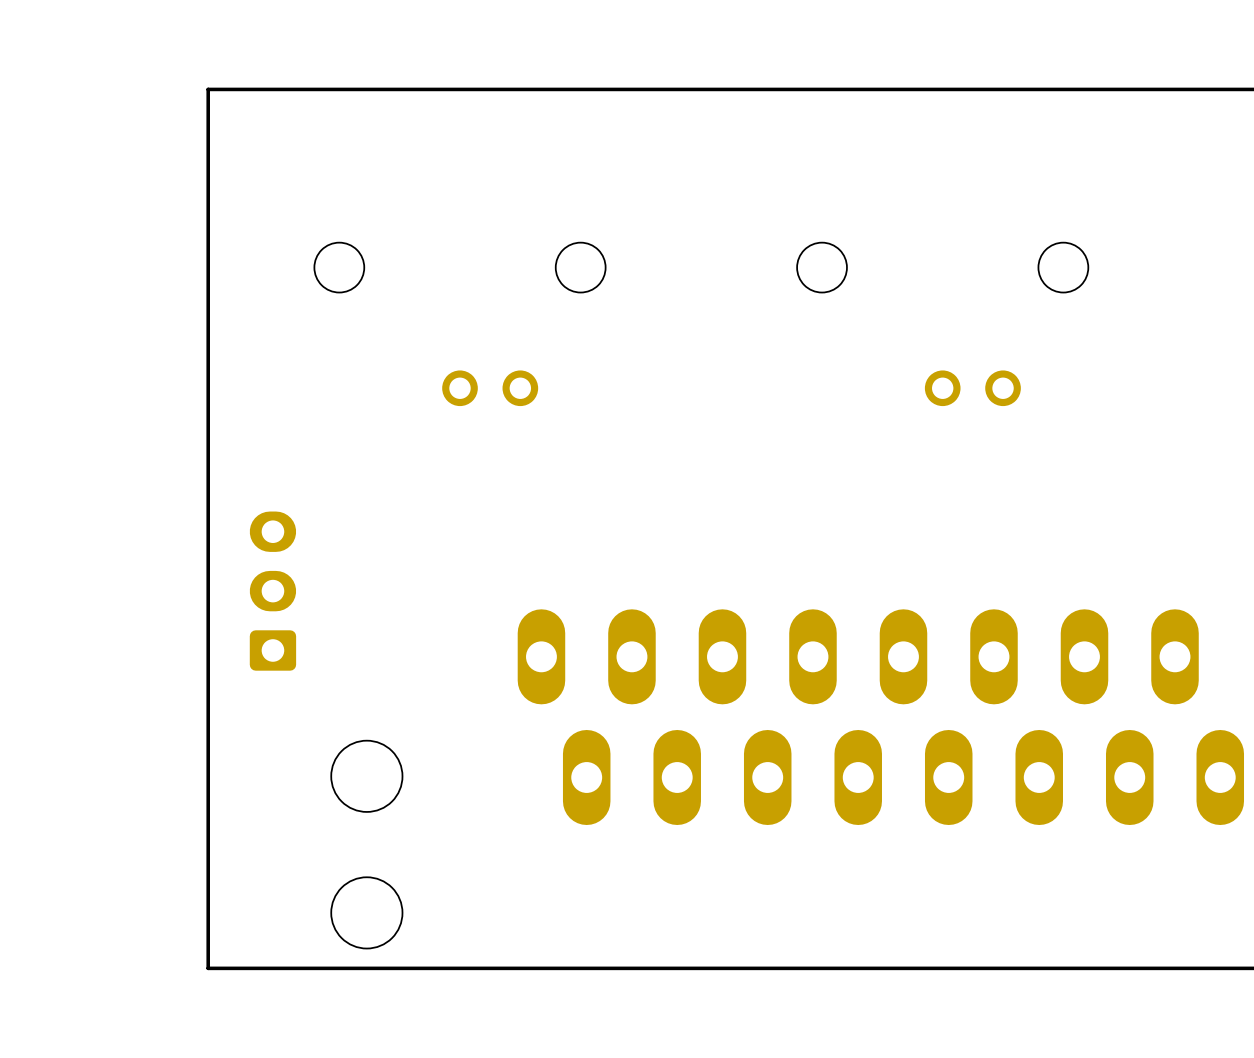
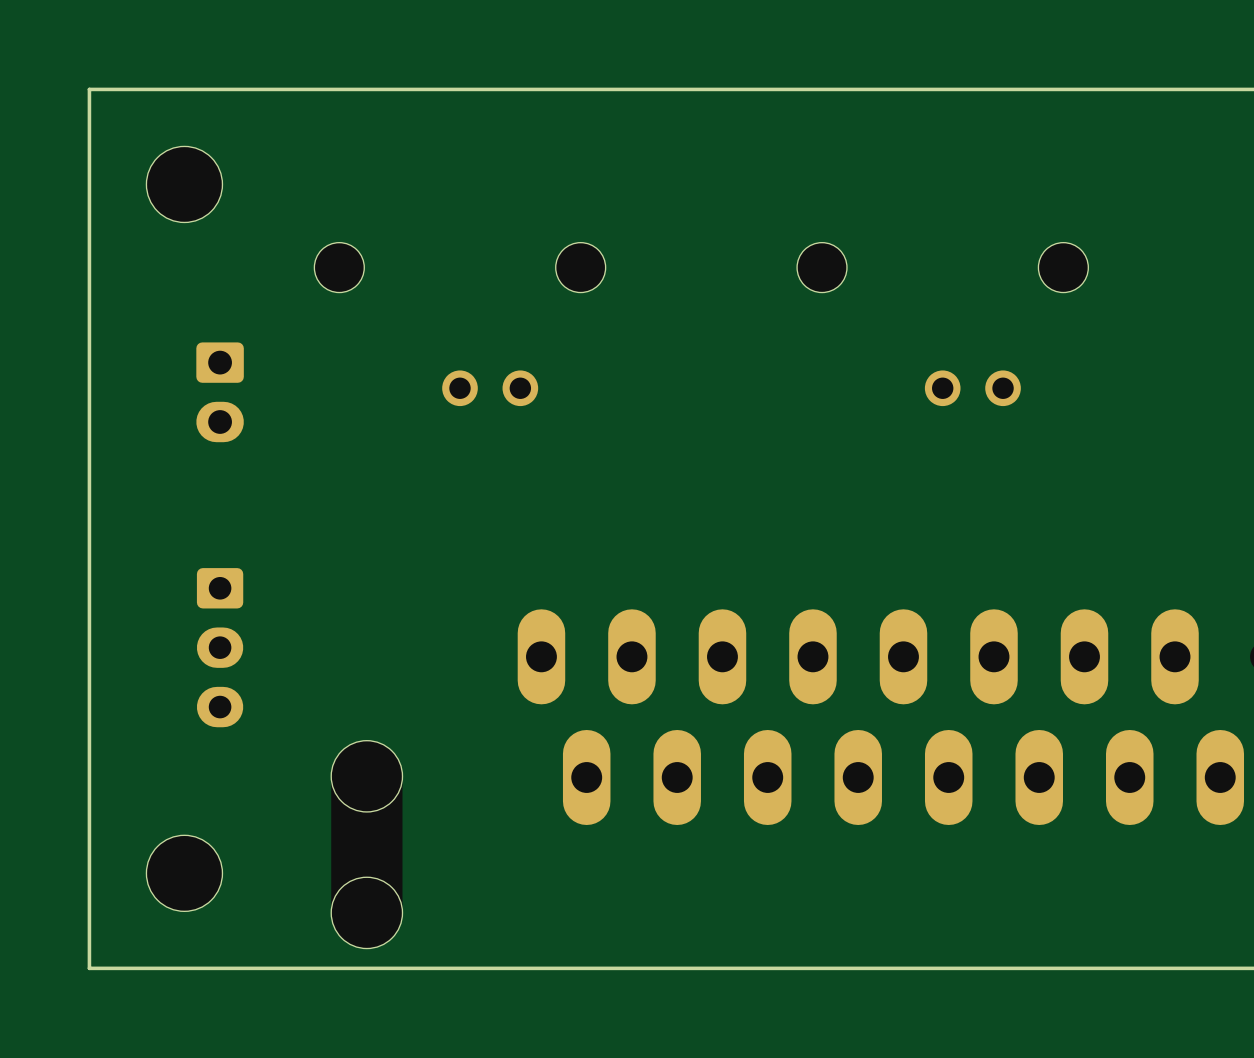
board edge: (208, 89) (208, 968) -> (208, 89) (89, 89) (89, 968) (208, 968)
part: none -> (184, 184)
part: none -> (220, 392)
part rotation: 0° (272, 591) -> 180° (220, 647)
part: none -> (184, 873)

